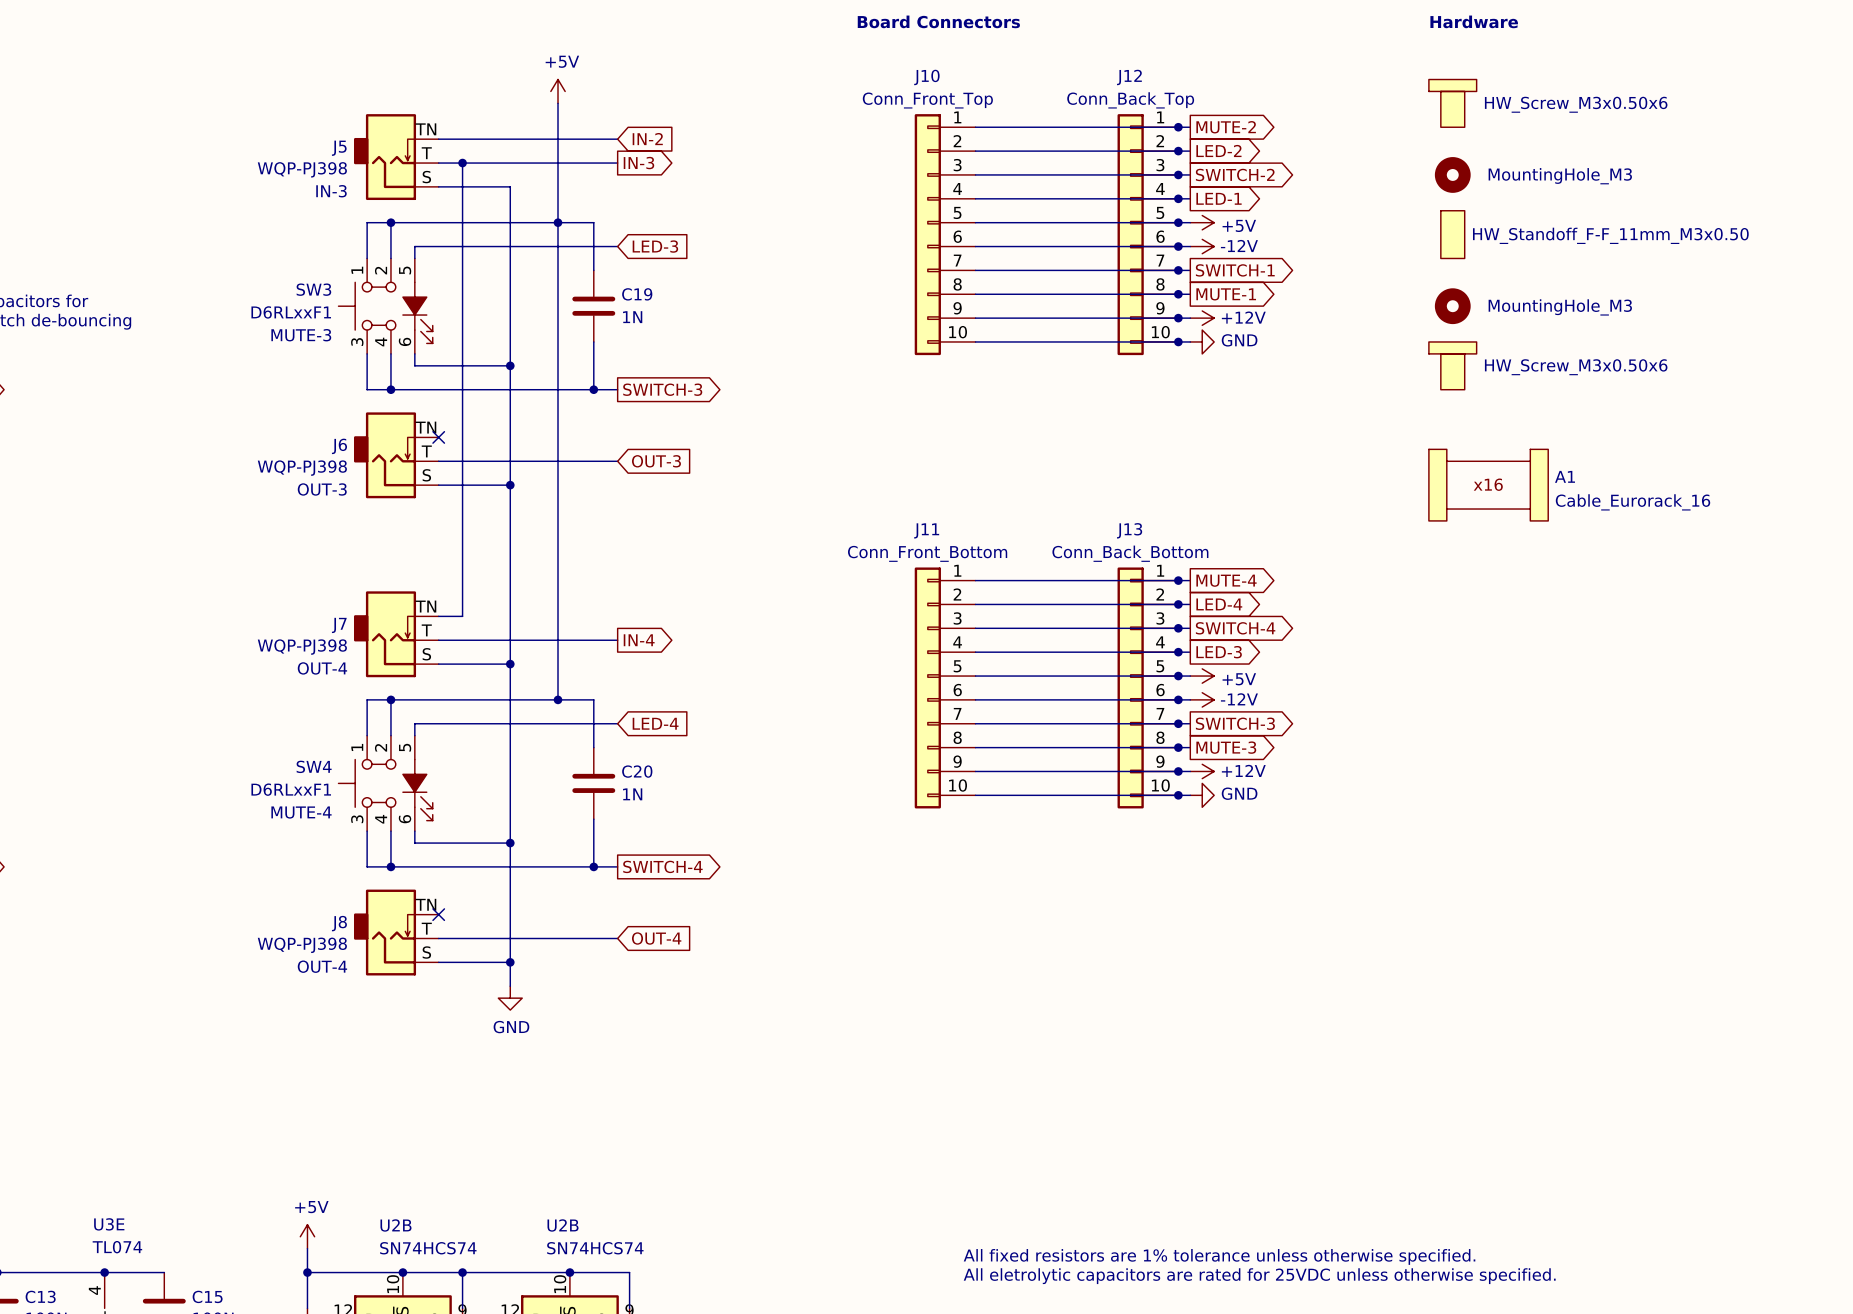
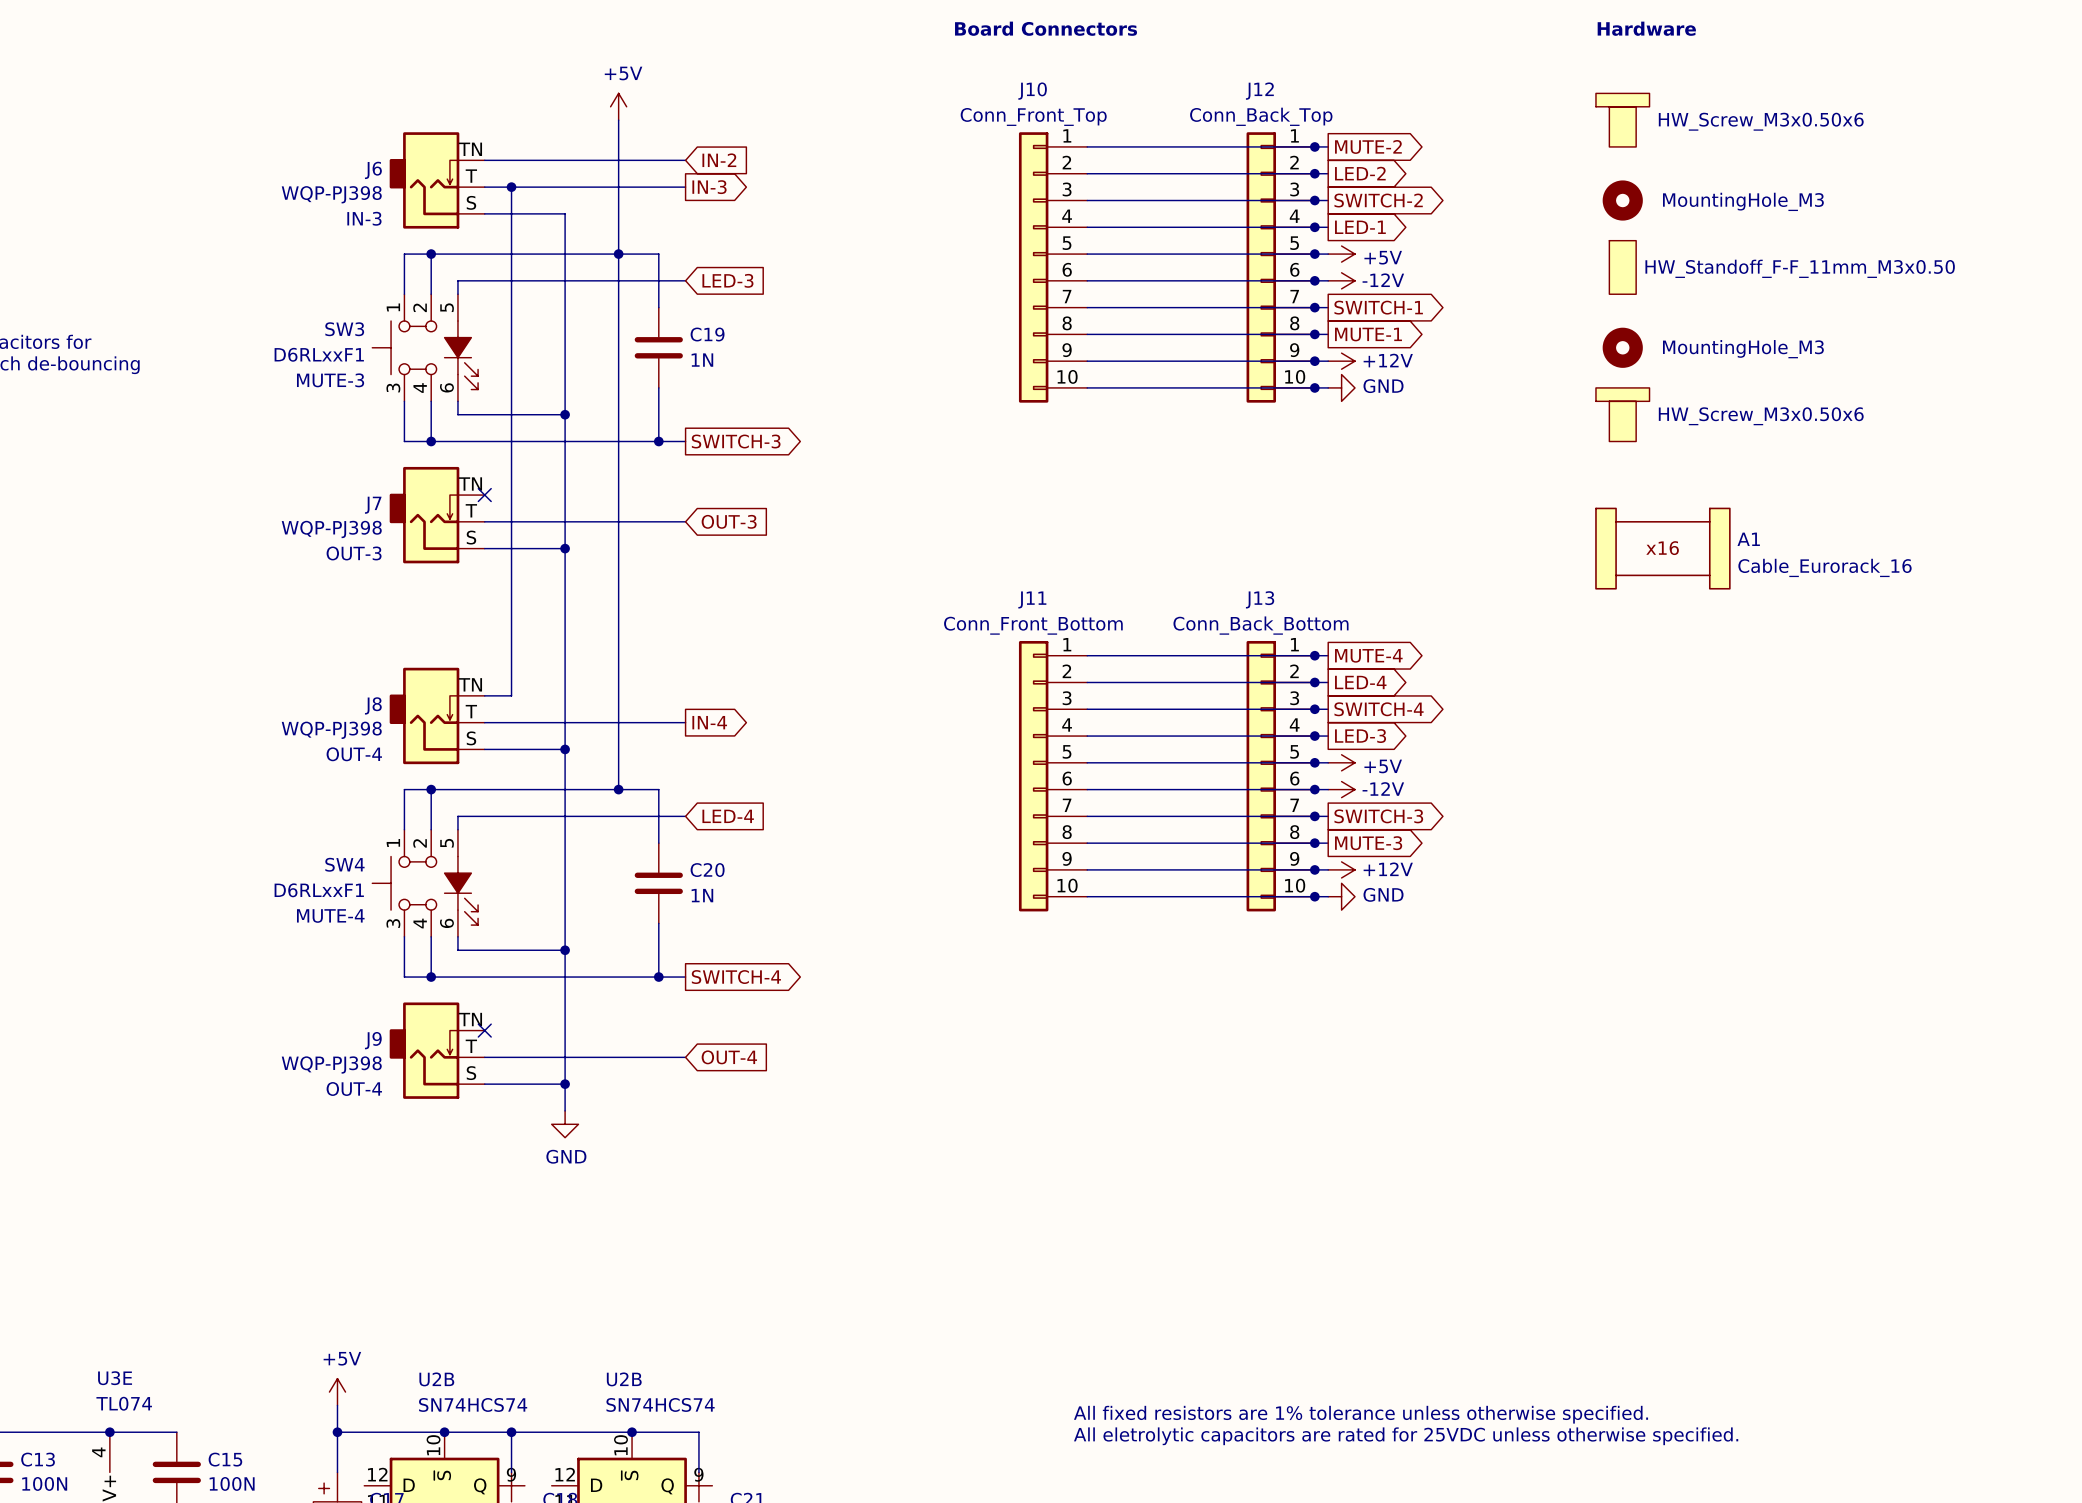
J5 name: J5 (339, 148) -> J6 (373, 170)
J6 name: J6 (339, 446) -> J7 (373, 505)
J7 name: J7 (339, 625) -> J8 (373, 705)
J8 name: J8 (339, 923) -> J9 (373, 1040)

